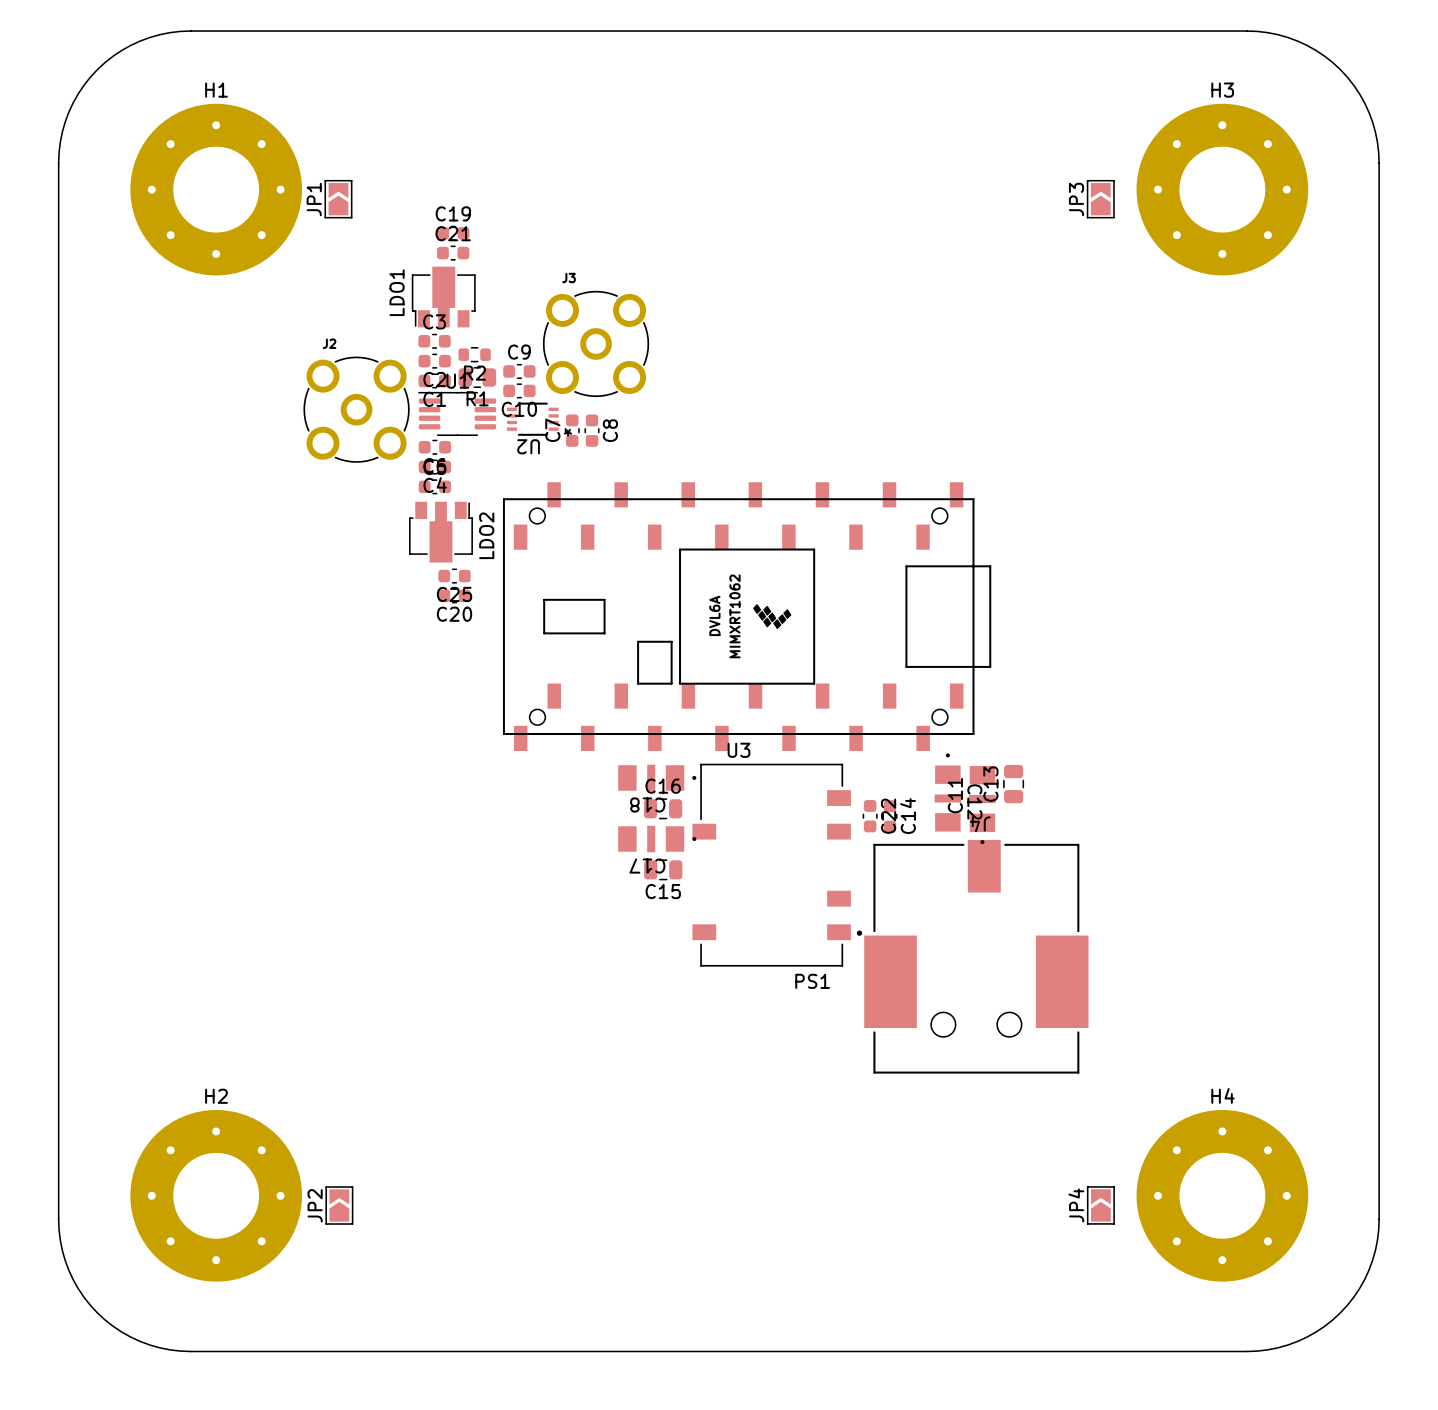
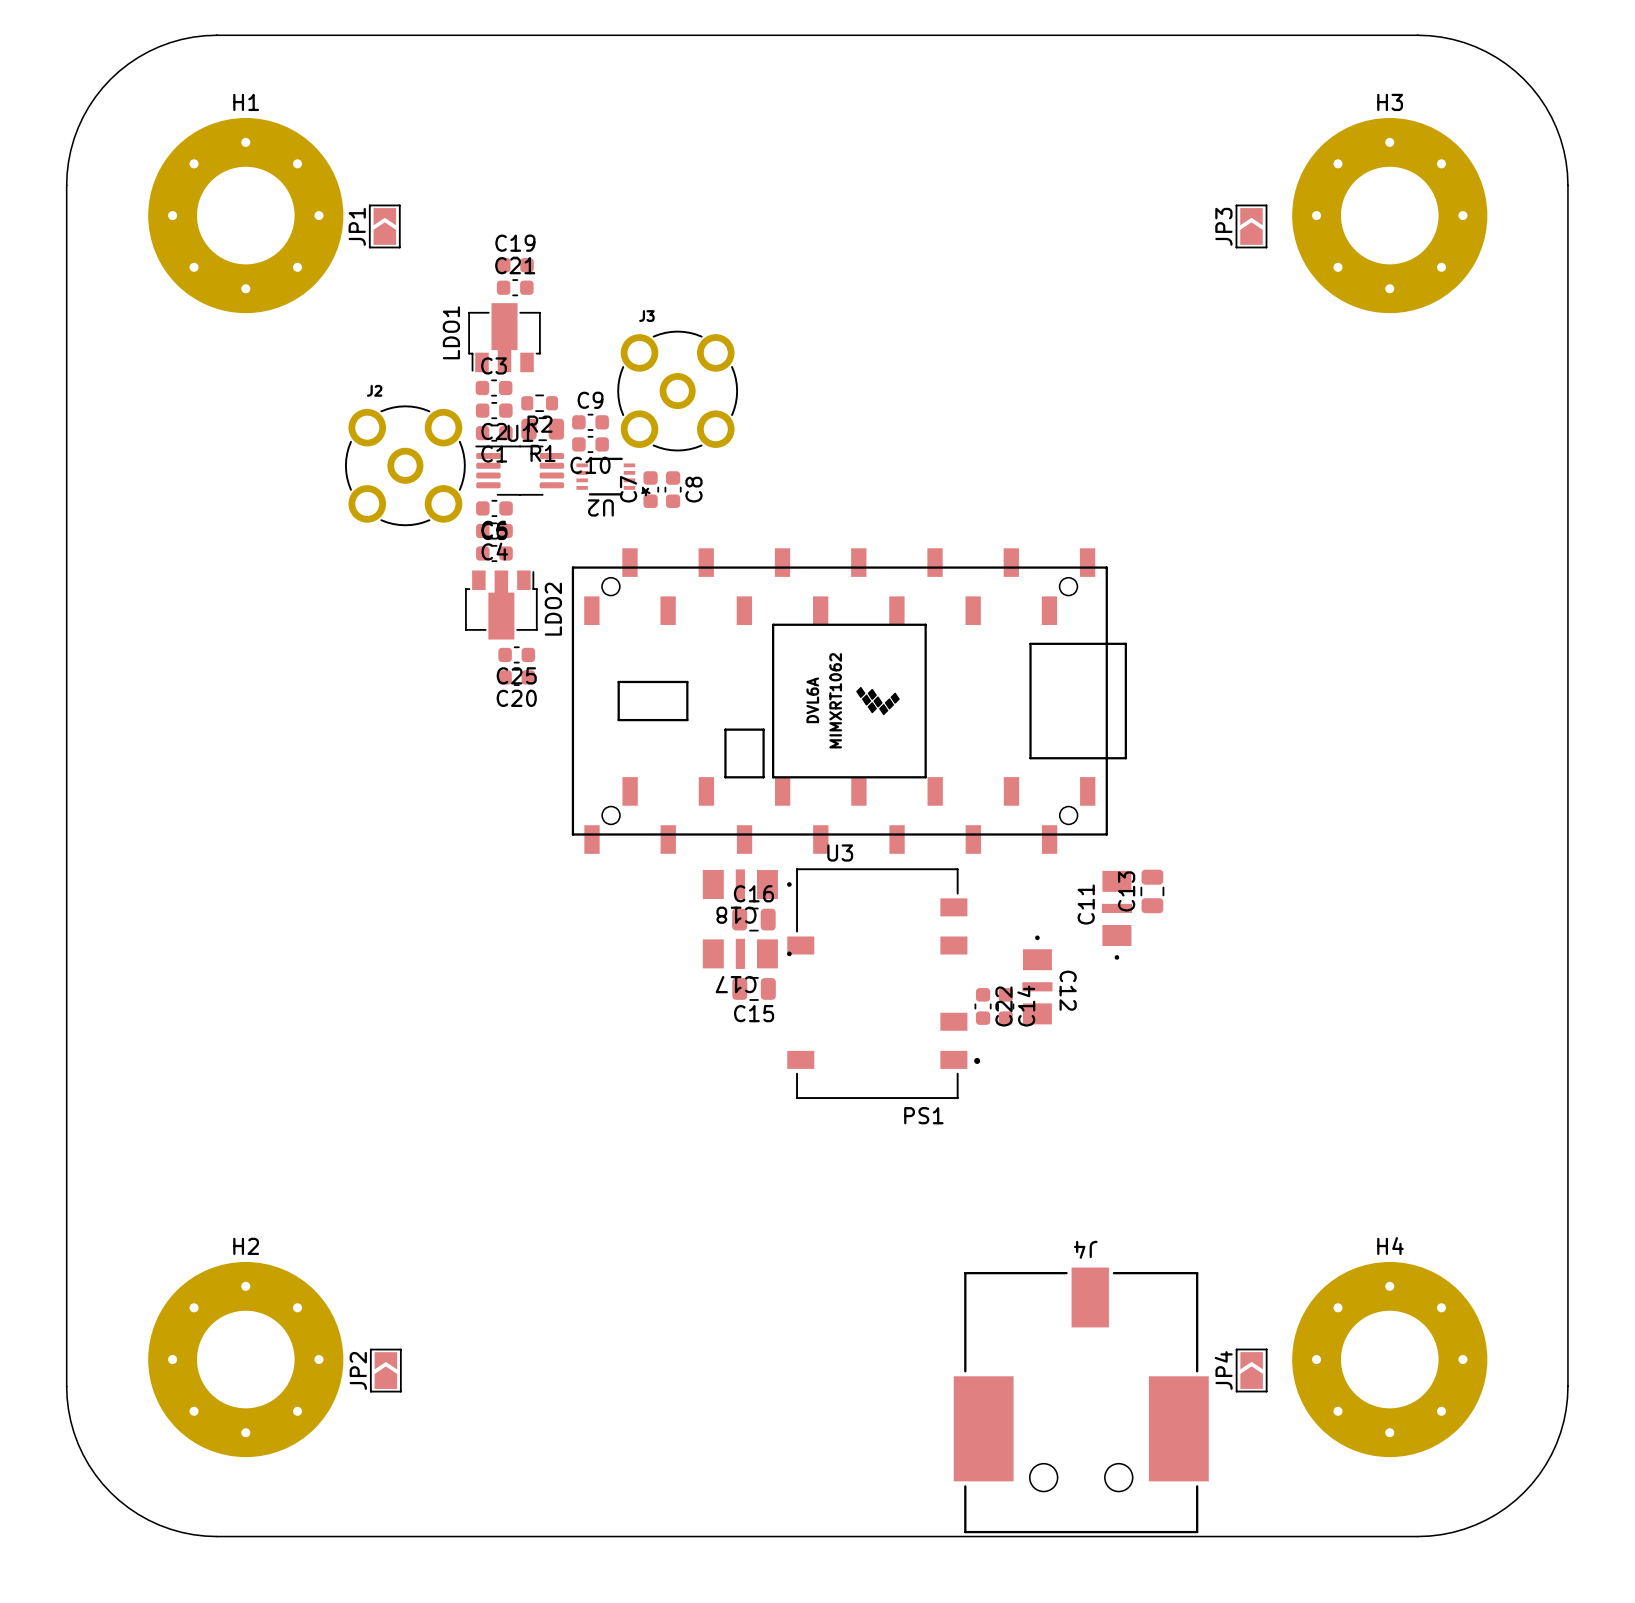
C12 position: (947, 792) -> (1037, 979)
C22 position: (870, 816) -> (983, 1006)
C14 position: (889, 816) -> (1005, 1006)
J4 position: (976, 956) -> (1081, 1400)

